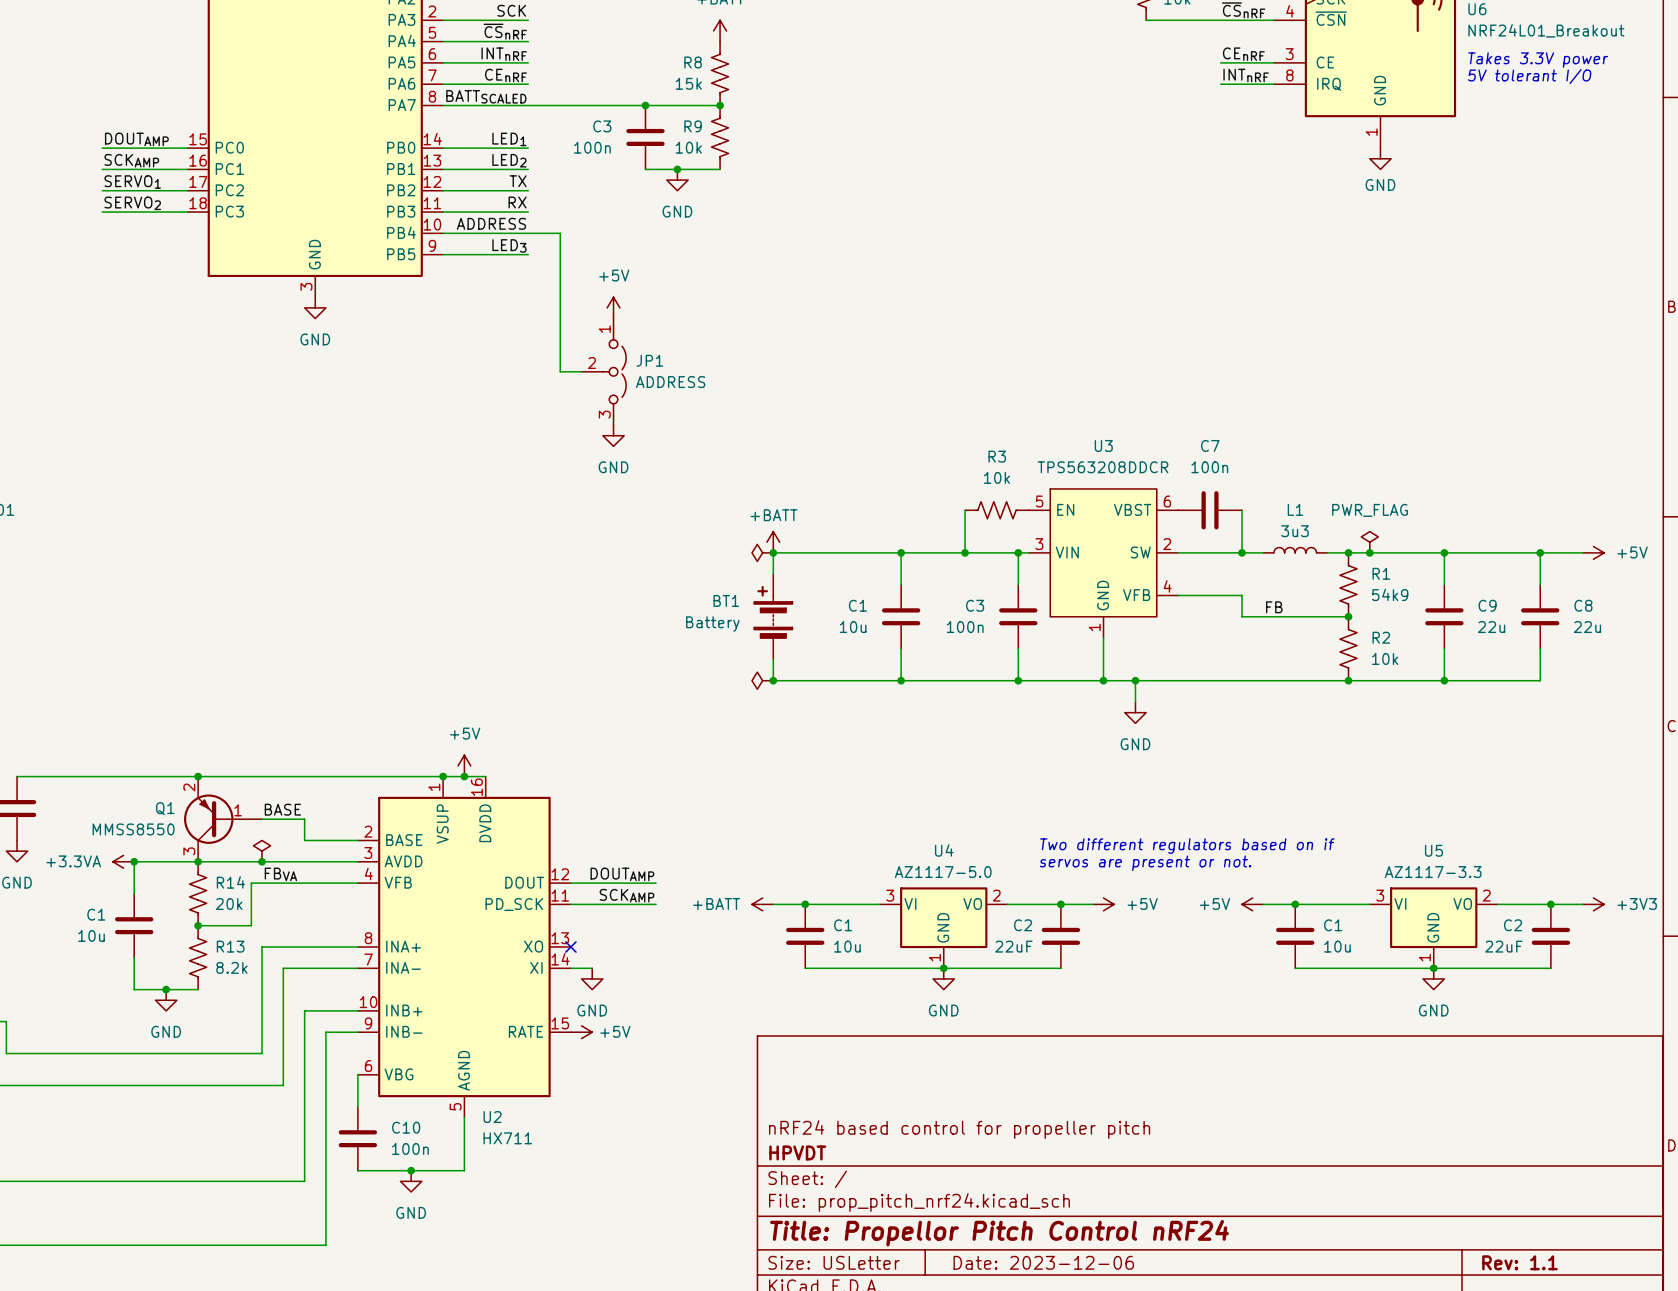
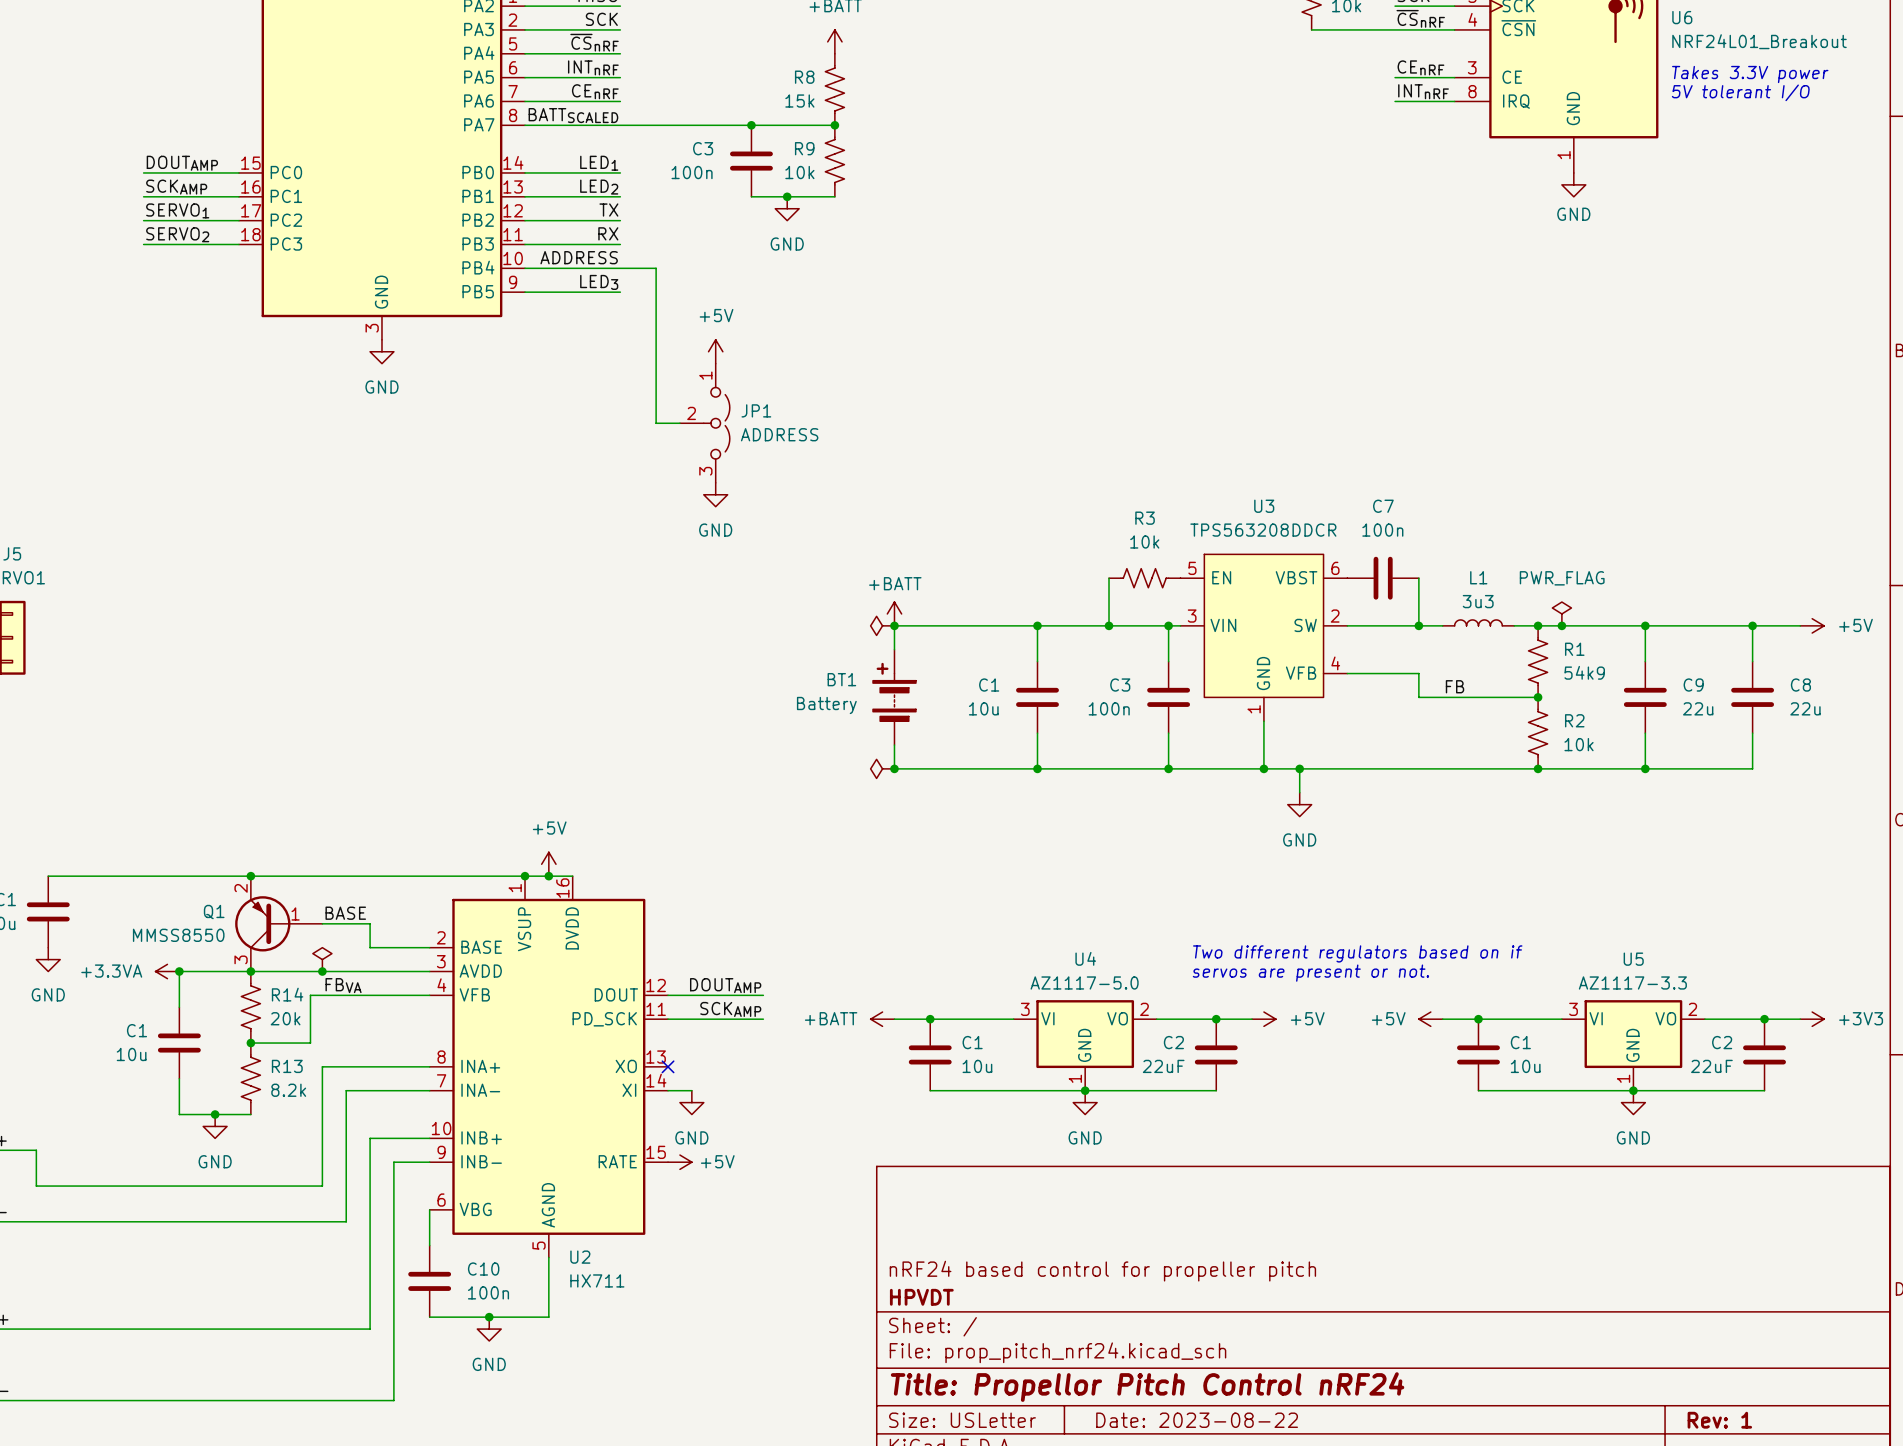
title block: Date: 2023-12-06 (1043, 1262) -> Date: 2023-08-22 (1197, 1420)
title block: Rev: 1.1 (1519, 1262) -> Rev: 1 (1719, 1420)

